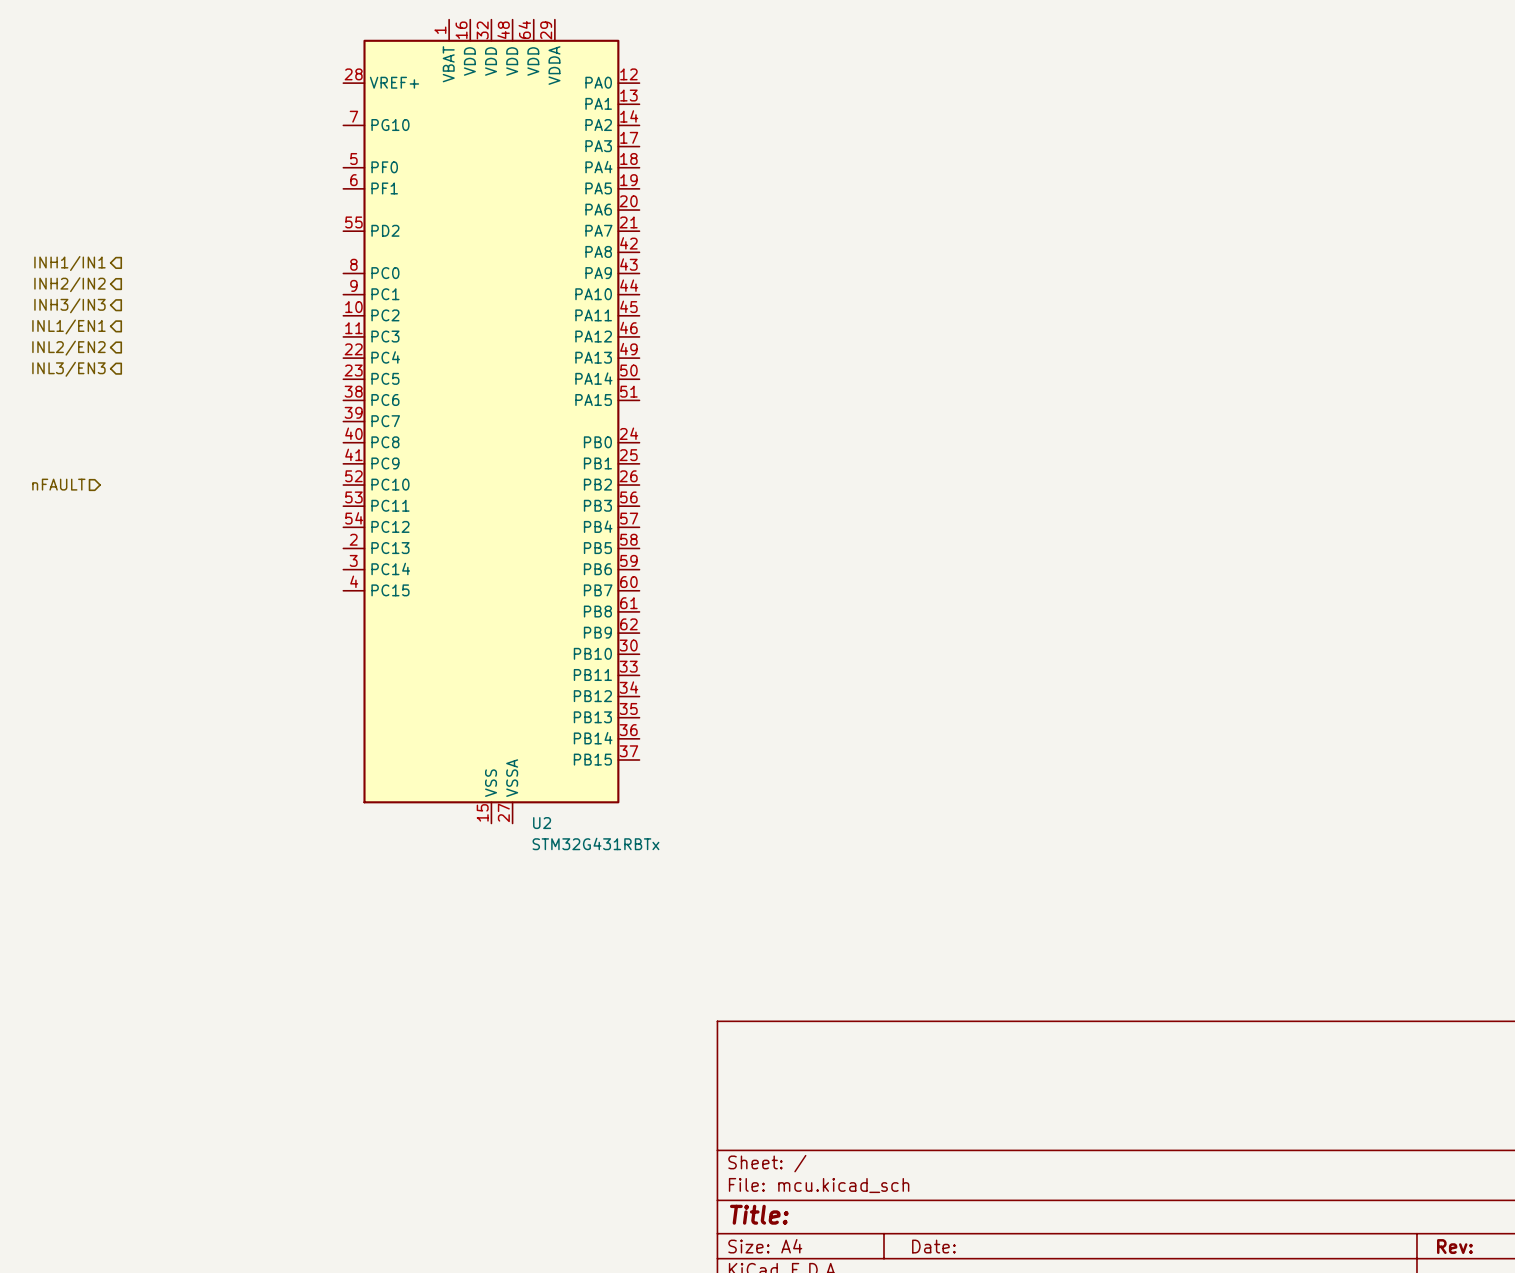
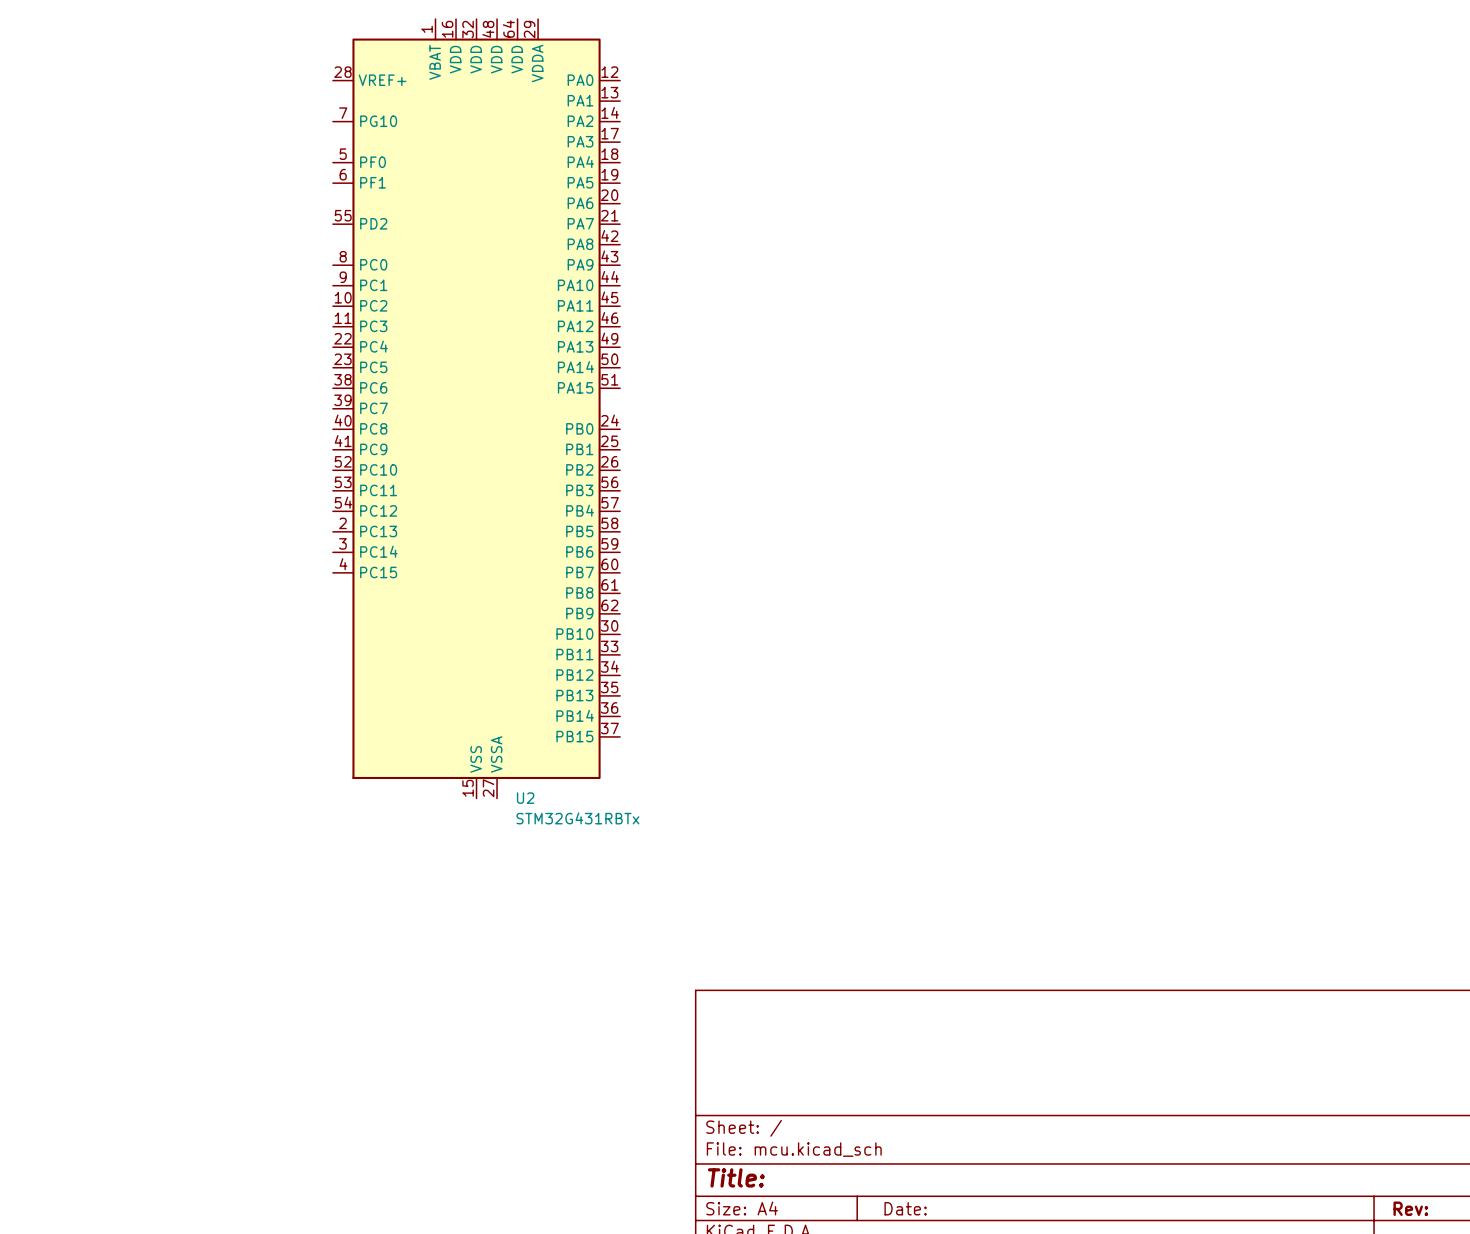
hierarchical label: INH1/IN1 (69, 263) -> none
hierarchical label: INH2/IN2 (69, 284) -> none
hierarchical label: INH3/IN3 (69, 305) -> none
hierarchical label: INL1/EN1 (68, 326) -> none
hierarchical label: INL2/EN2 (68, 348) -> none
hierarchical label: INL3/EN3 (68, 369) -> none
hierarchical label: nFAULT (58, 484) -> none

